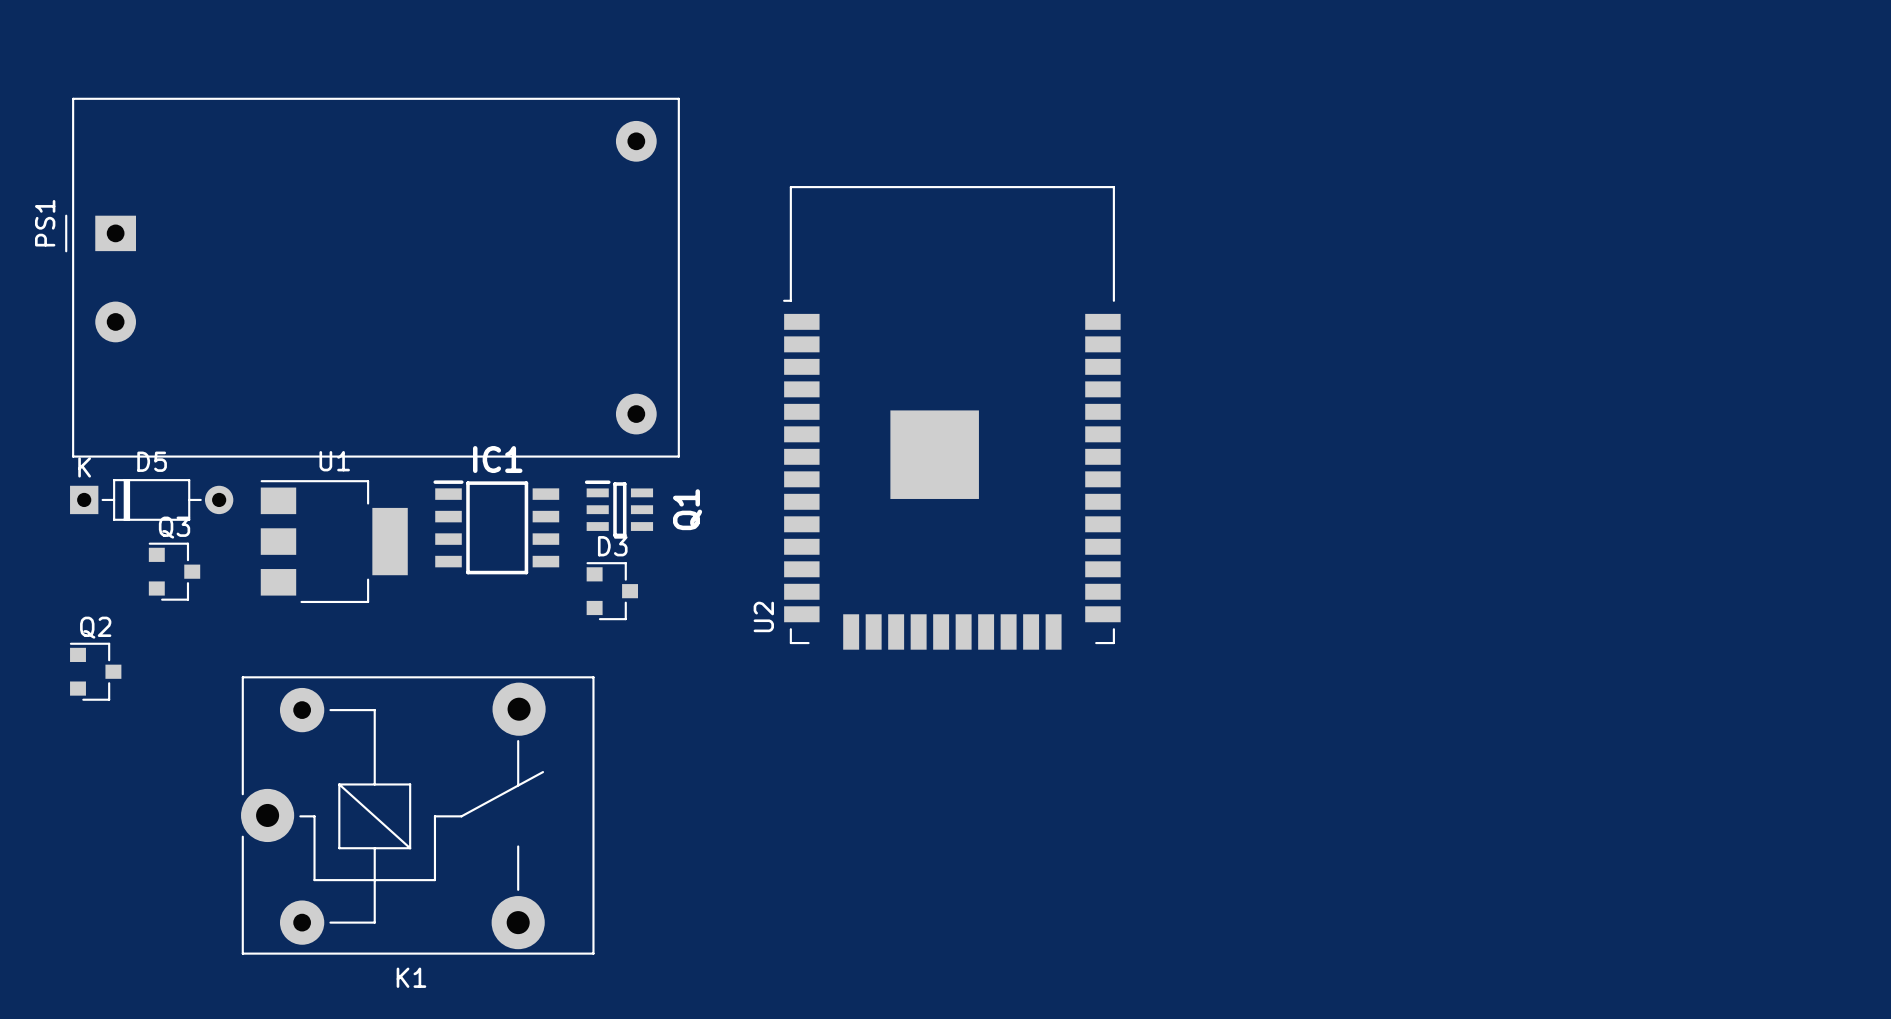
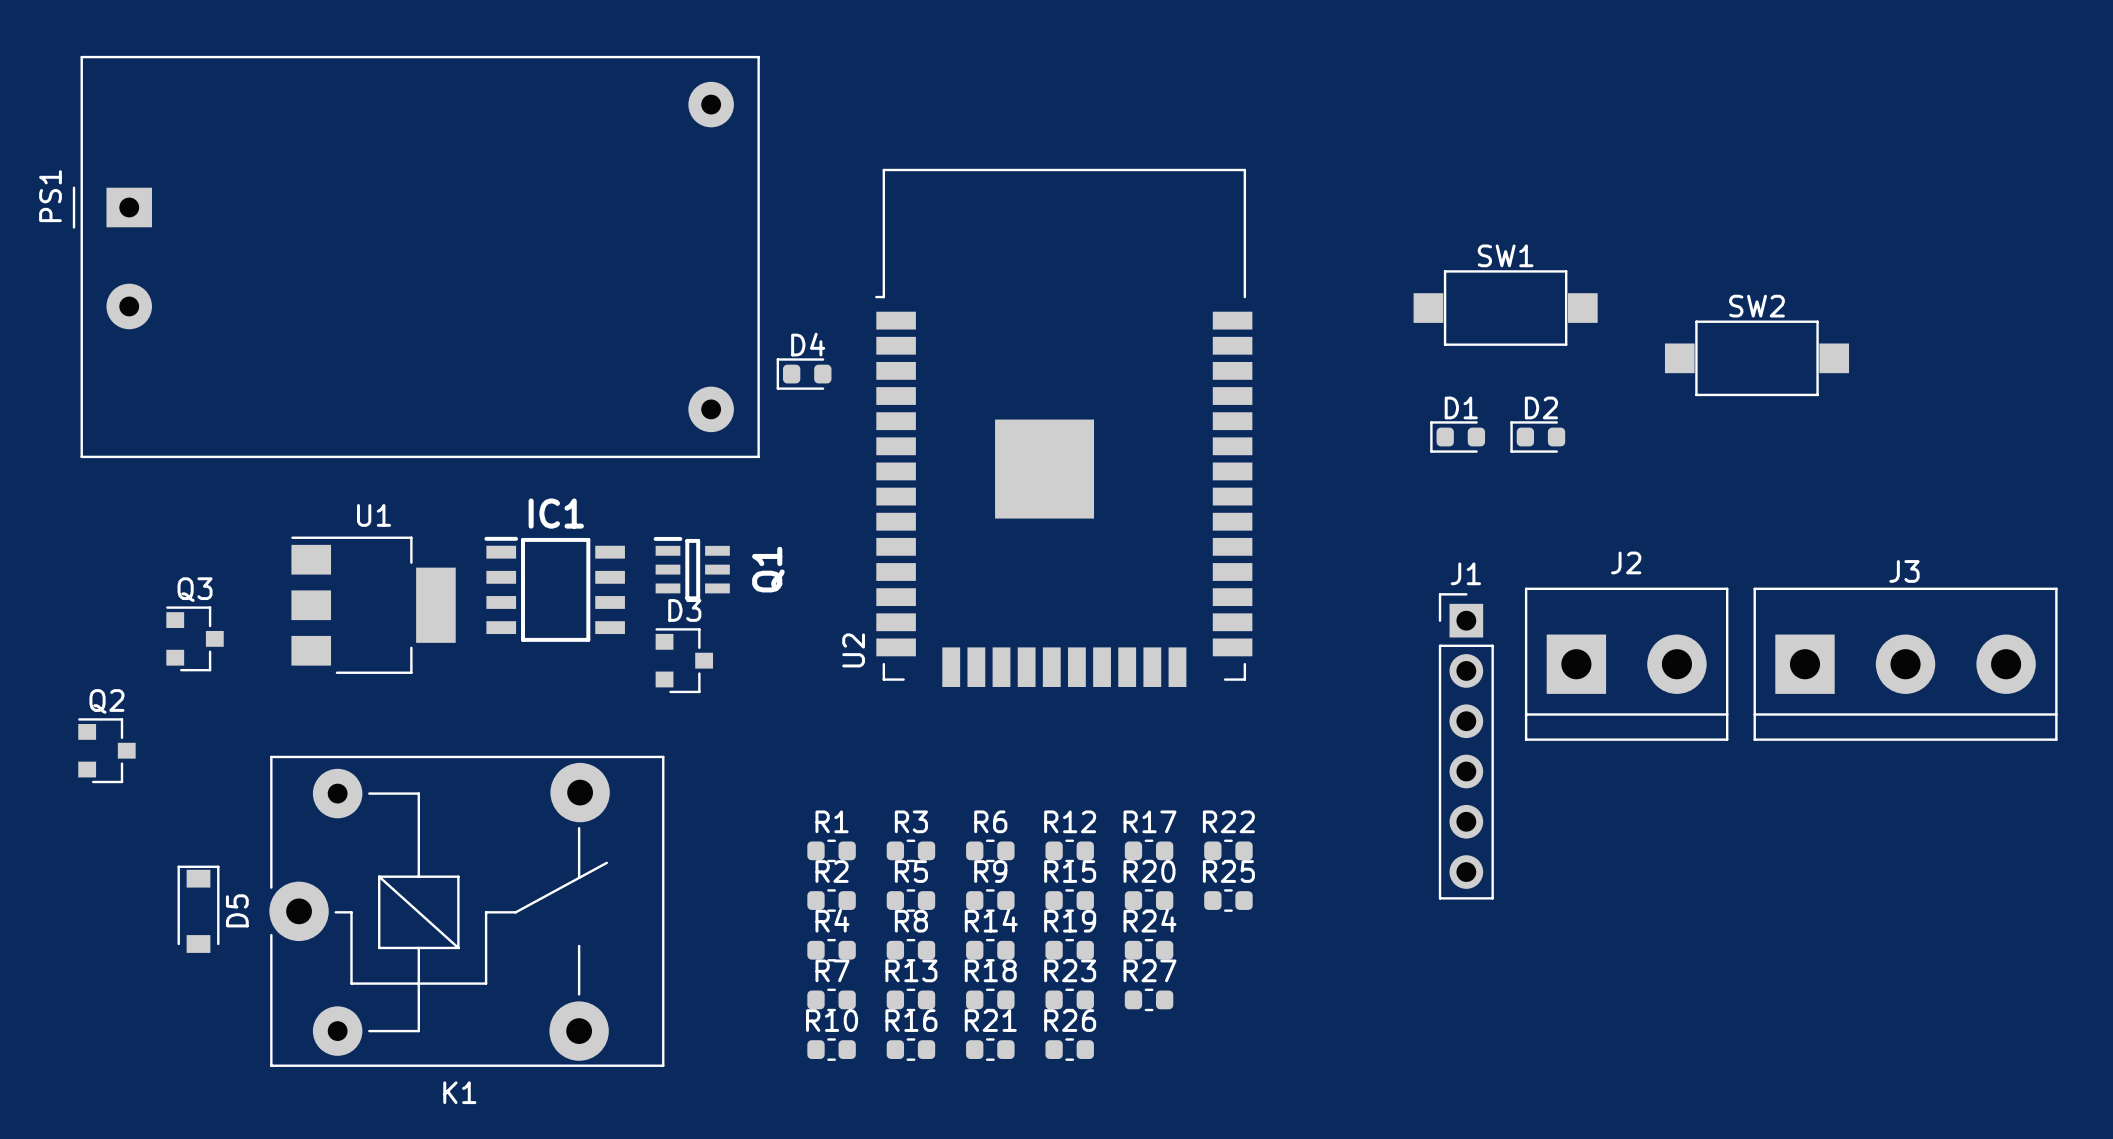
SW1: none -> (1505, 308)
PS1 position: (372, 277) -> (416, 256)
SW2: none -> (1757, 358)
D4: none -> (804, 374)
D1: none -> (1457, 437)
D2: none -> (1537, 437)
U2 position: (951, 417) -> (1063, 427)
D5 name position: D5 (152, 461) -> D5 (237, 910)
D5 footprint: [70, 479, 234, 521] -> [177, 865, 220, 953]
J2: none -> (1626, 664)
J3: none -> (1905, 664)
J1: none -> (1466, 746)
R1: none -> (831, 850)
R3: none -> (910, 850)
R6: none -> (990, 850)
R12: none -> (1069, 850)
R17: none -> (1149, 850)
R22: none -> (1228, 850)
R2: none -> (831, 900)
R5: none -> (910, 900)
R9: none -> (990, 900)
R15: none -> (1069, 900)
R20: none -> (1149, 900)
R25: none -> (1228, 900)
R4: none -> (831, 950)
R8: none -> (910, 950)
R14: none -> (990, 950)
R19: none -> (1069, 950)
R24: none -> (1149, 950)
R7: none -> (831, 999)
R13: none -> (910, 999)
R18: none -> (990, 999)
R23: none -> (1069, 999)
R27: none -> (1149, 999)
R10: none -> (831, 1049)
R16: none -> (910, 1049)
R21: none -> (990, 1049)
R26: none -> (1069, 1049)

